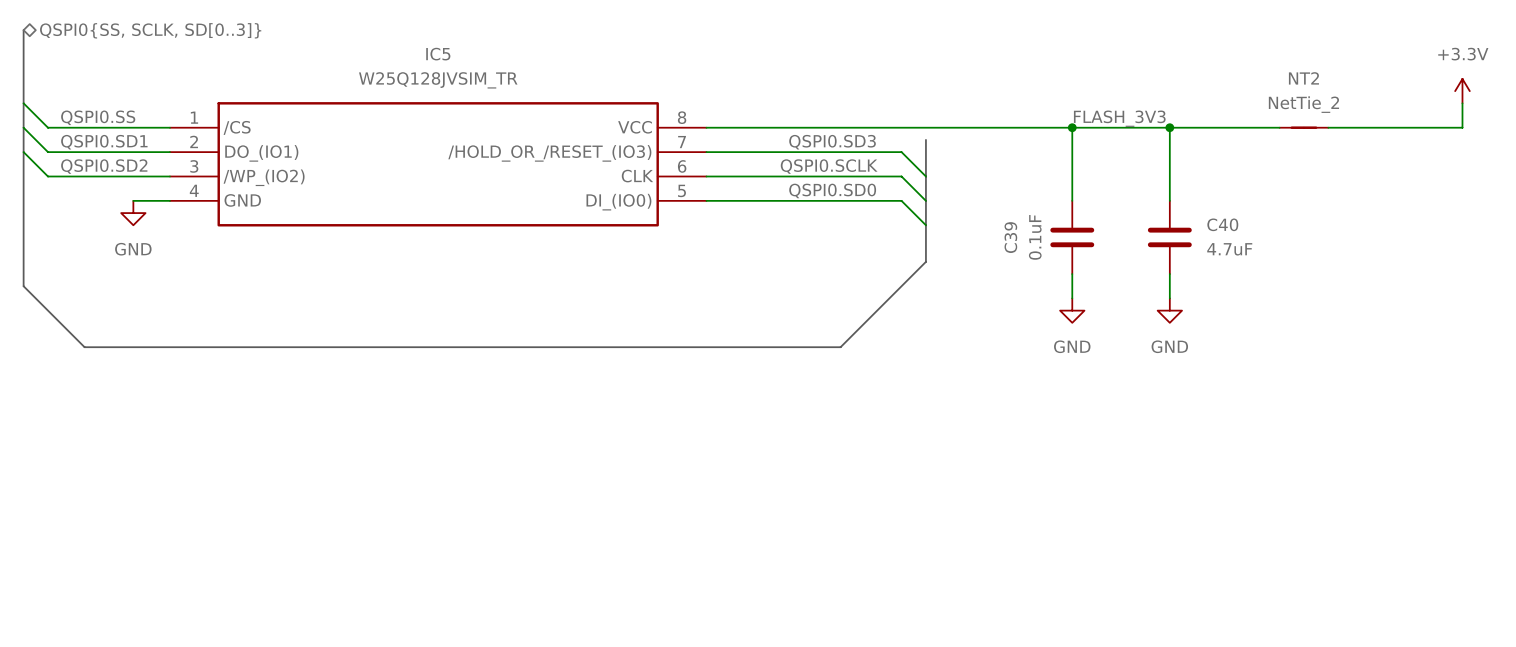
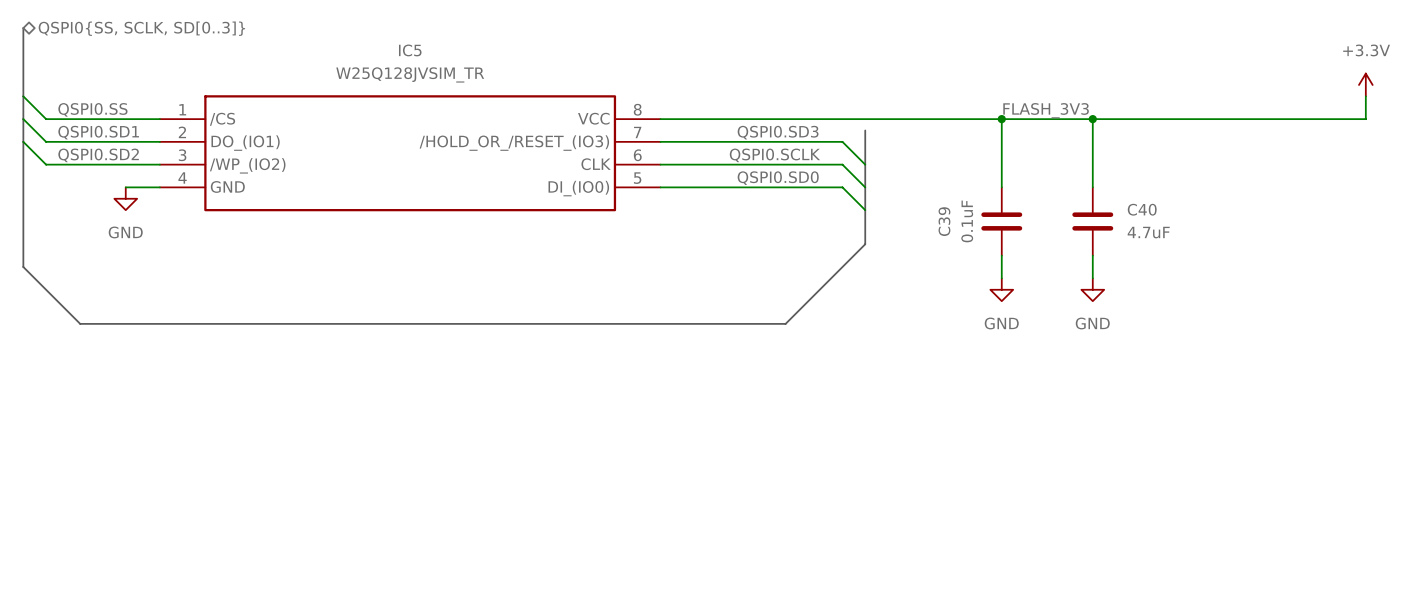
NT2: NetTie_2 (1303, 127) -> none

